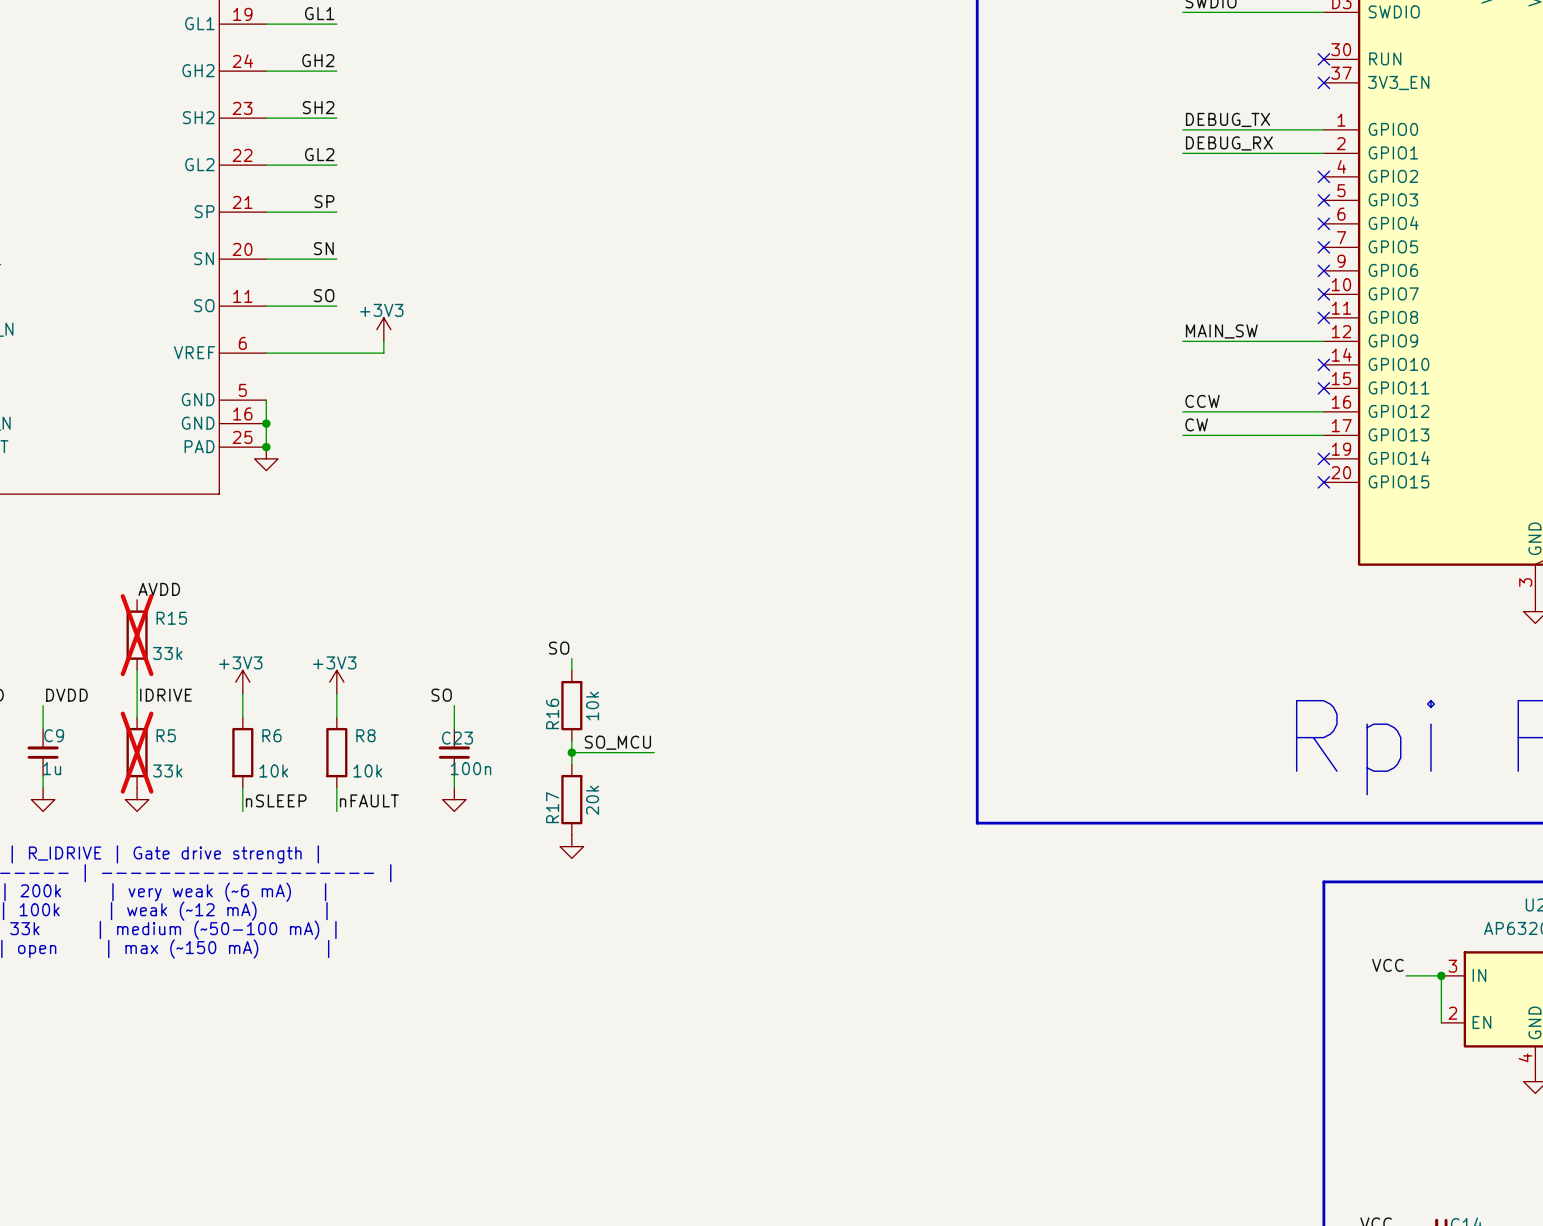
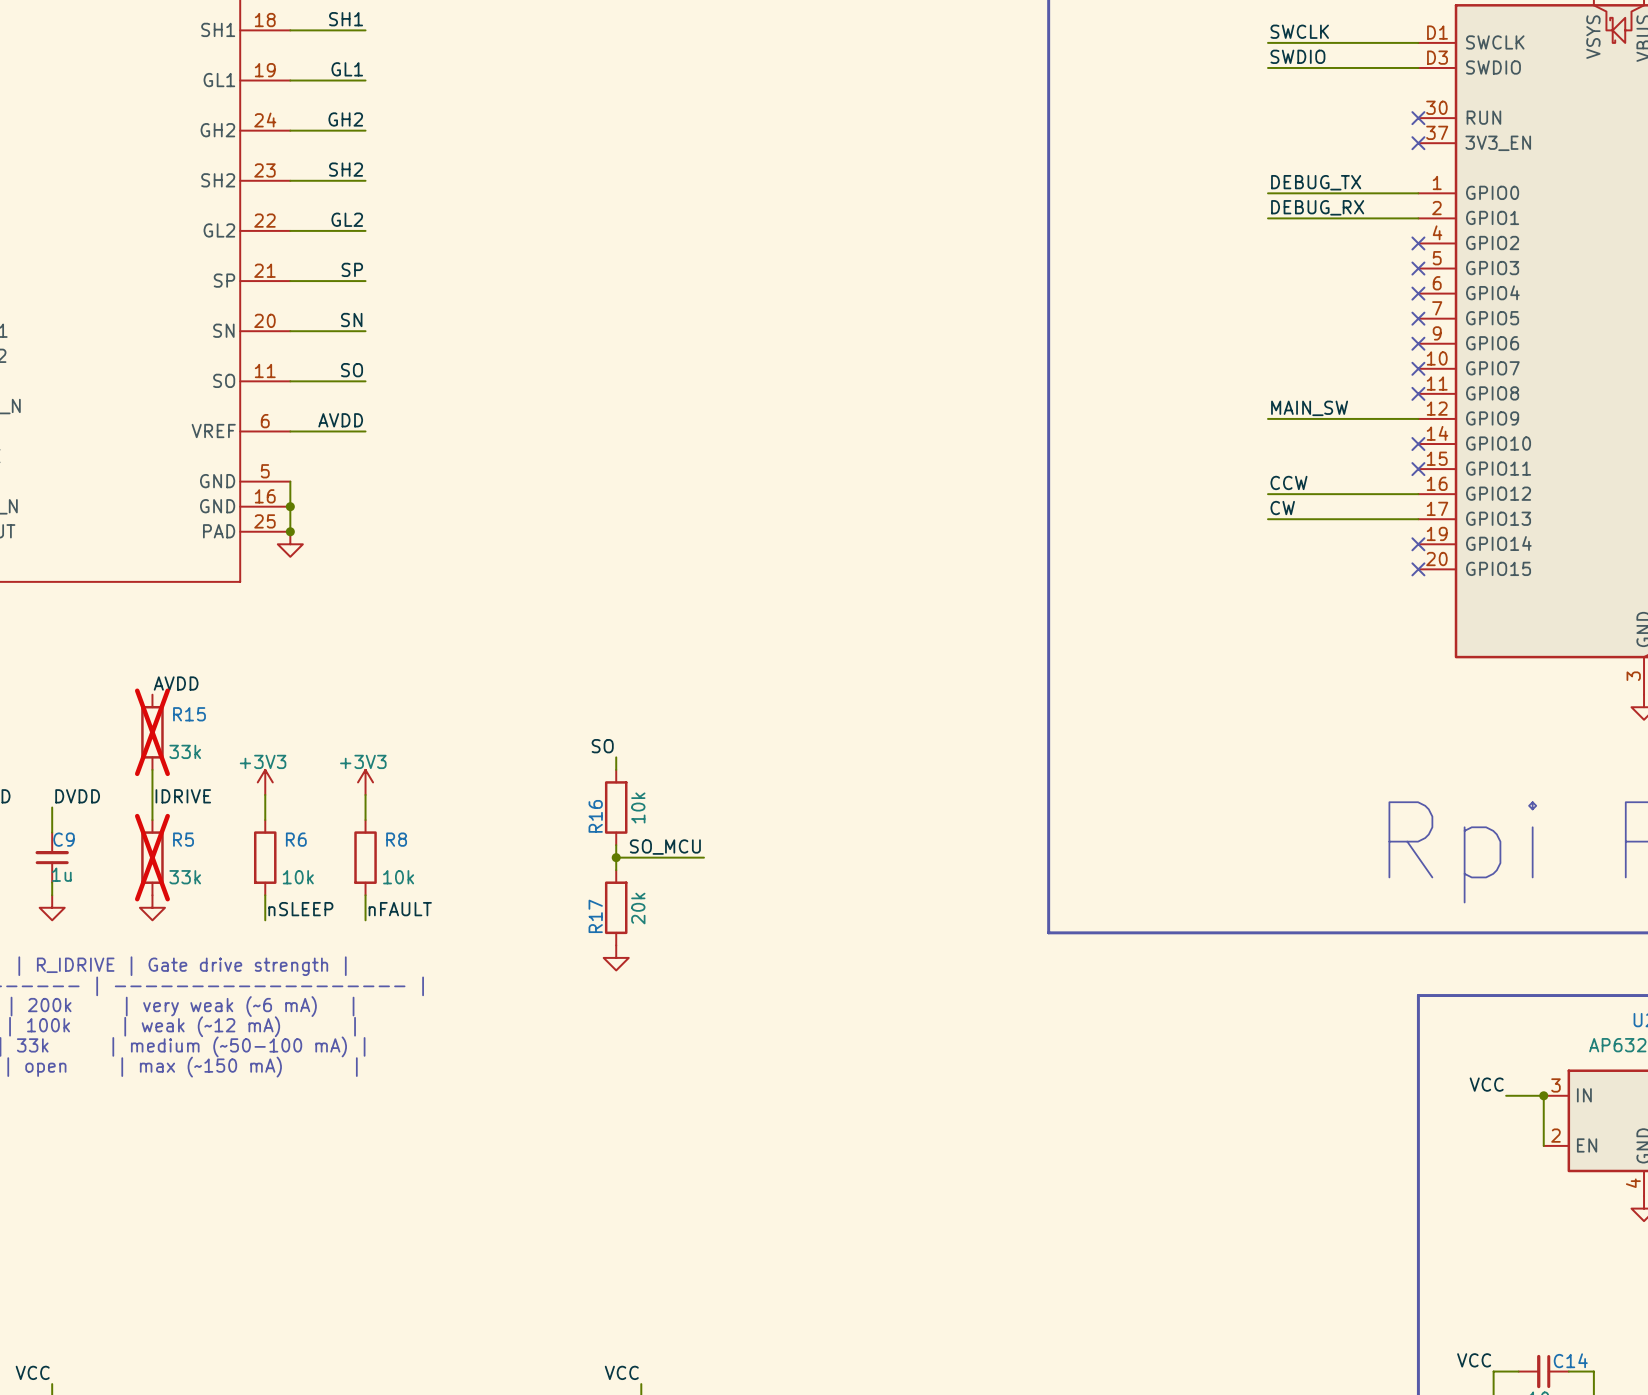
power symbol: +3V3 (383, 329) -> none
wire: (383, 341) (383, 353) (336, 353) -> none
label: none -> AVDD (340, 420)
label: SO (441, 695) -> none
wire: (454, 705) (454, 729) -> none
C23: 100n (454, 752) -> none
wire: (454, 776) (454, 787) -> none
power symbol: (454, 799) -> none

